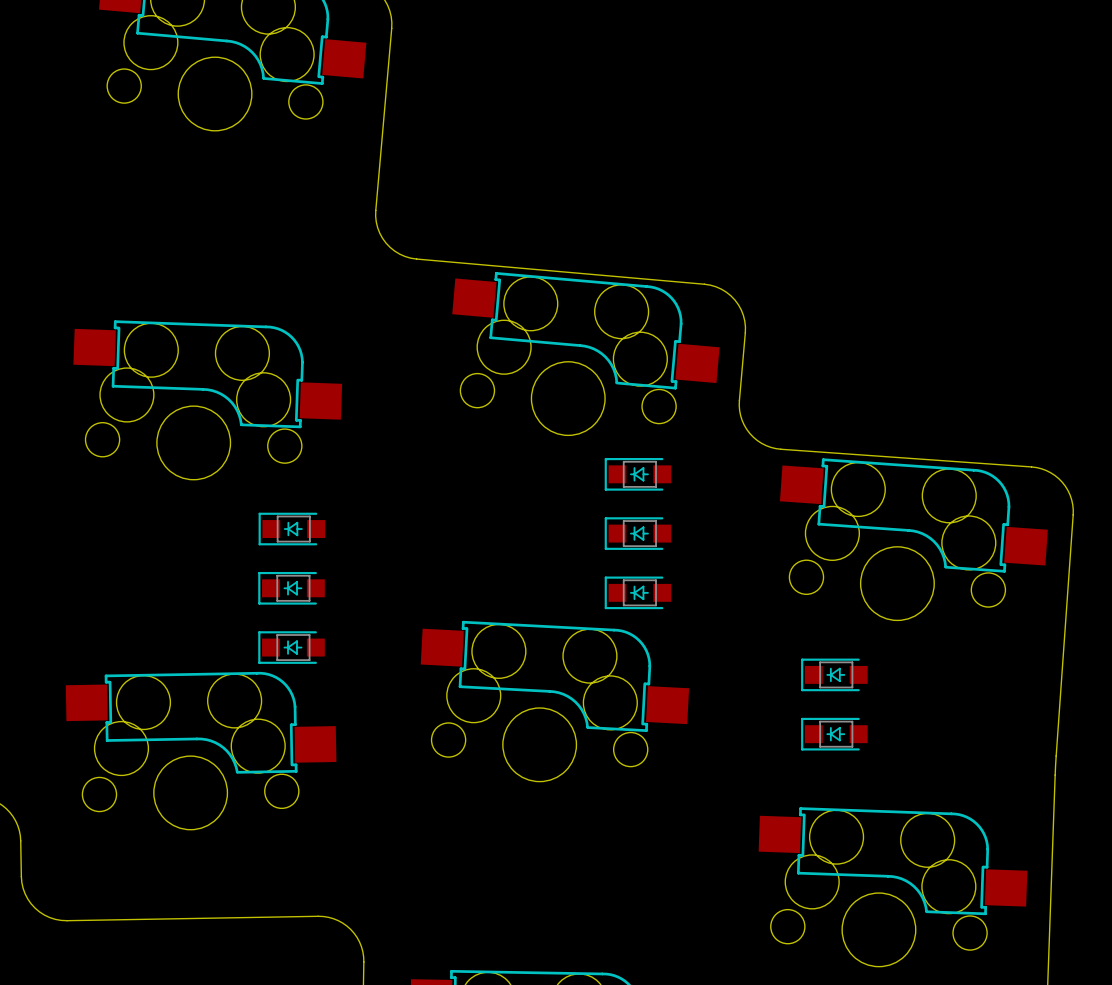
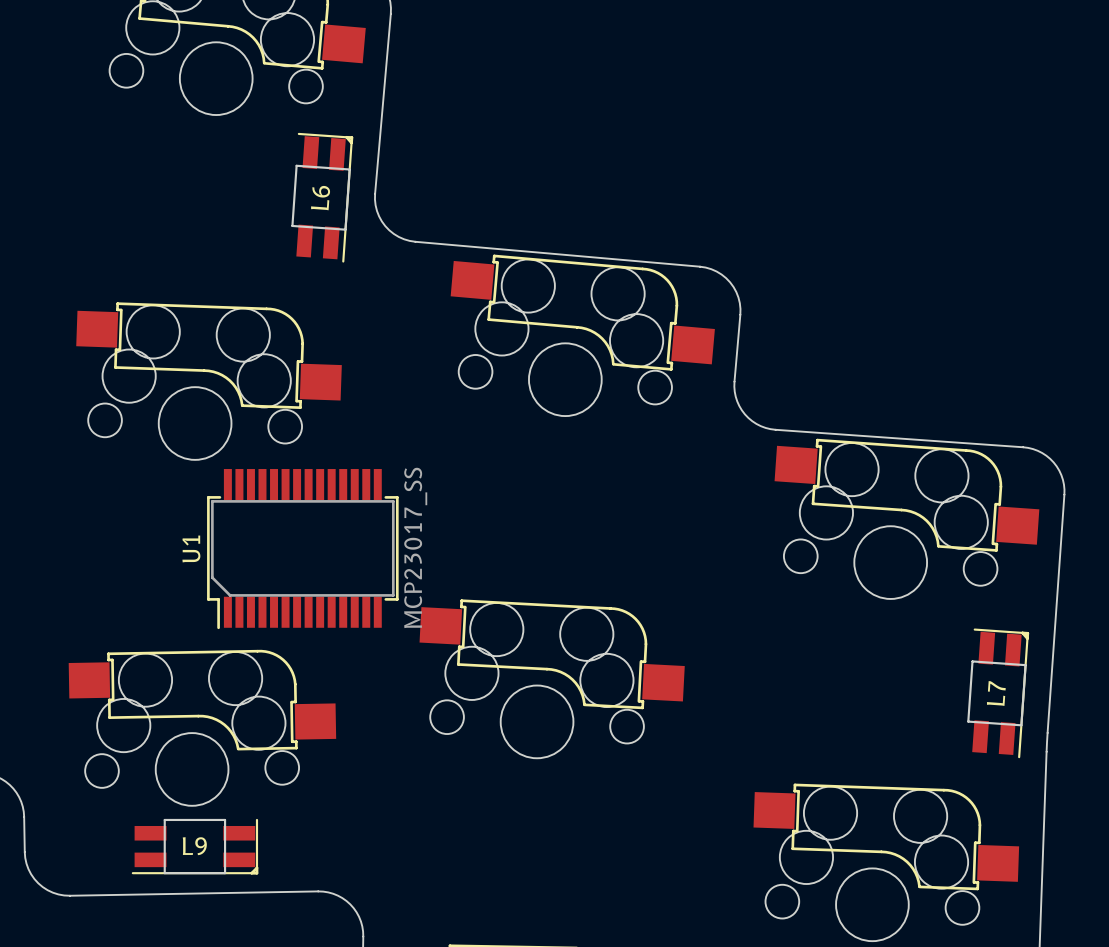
L6: none -> (322, 197)
part: (637, 474) -> none
part: (291, 529) -> none
part: (637, 533) -> none
U1: none -> MCP23017_SS (302, 549)
part: (291, 588) -> none
part: (637, 592) -> none
part: (291, 647) -> none
part: (834, 674) -> none
L7: none -> (998, 693)
part: (834, 734) -> none
L9: none -> (195, 846)

